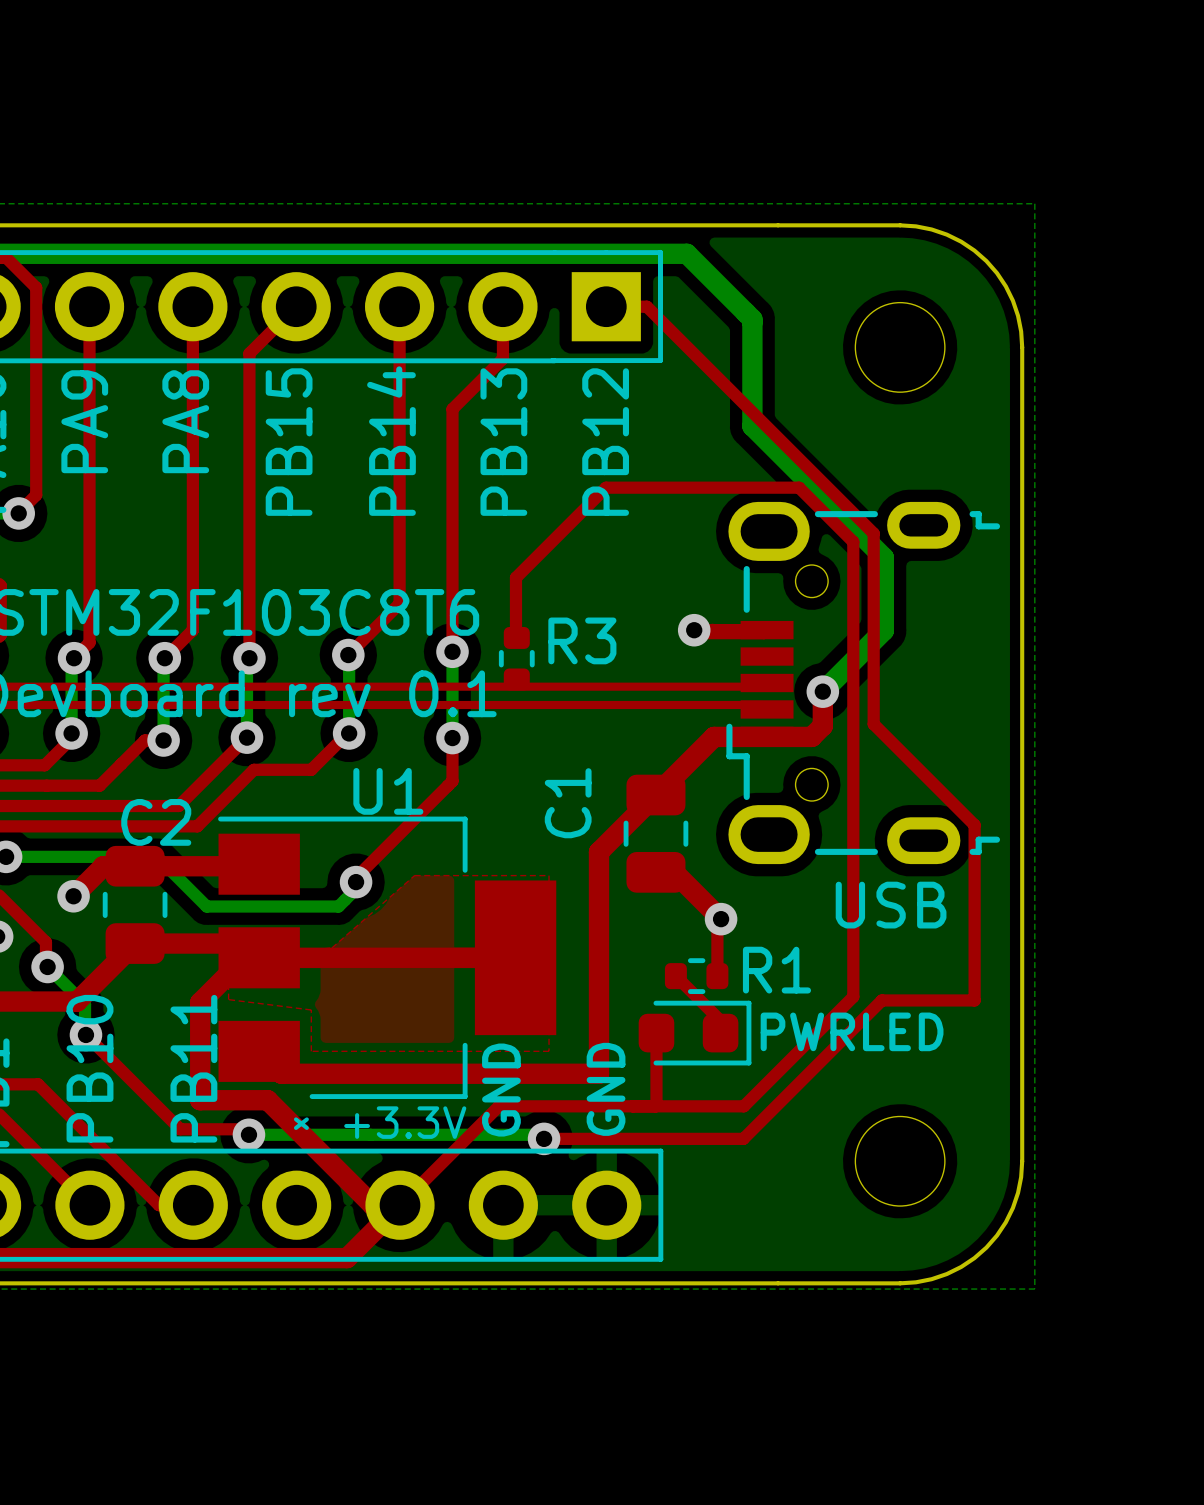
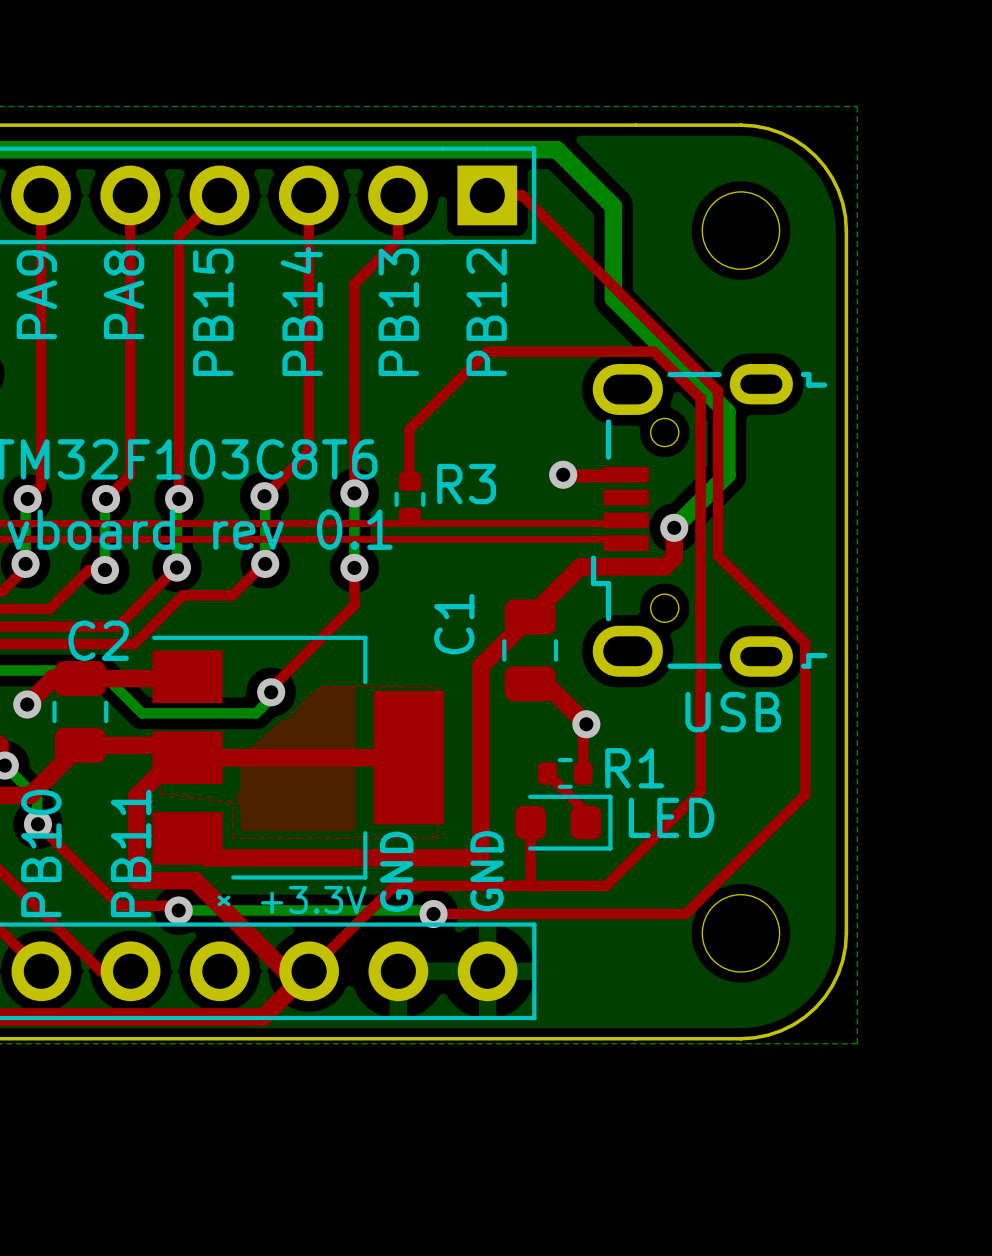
U1 name: U1 (388, 791) -> none
top track: (974, 1000) (881, 1000) (743, 1138) -> (805, 794) (685, 914) (605, 914)
LED name: none -> LED (671, 817)
text: PWRLED (852, 1031) -> none

